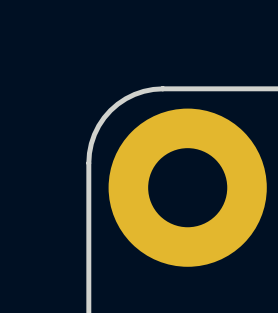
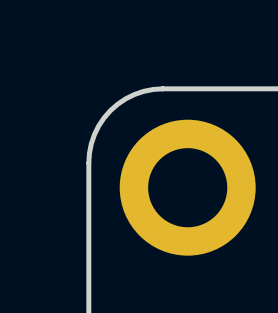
part footprint: [108, 108, 267, 267] -> [119, 119, 256, 256]

